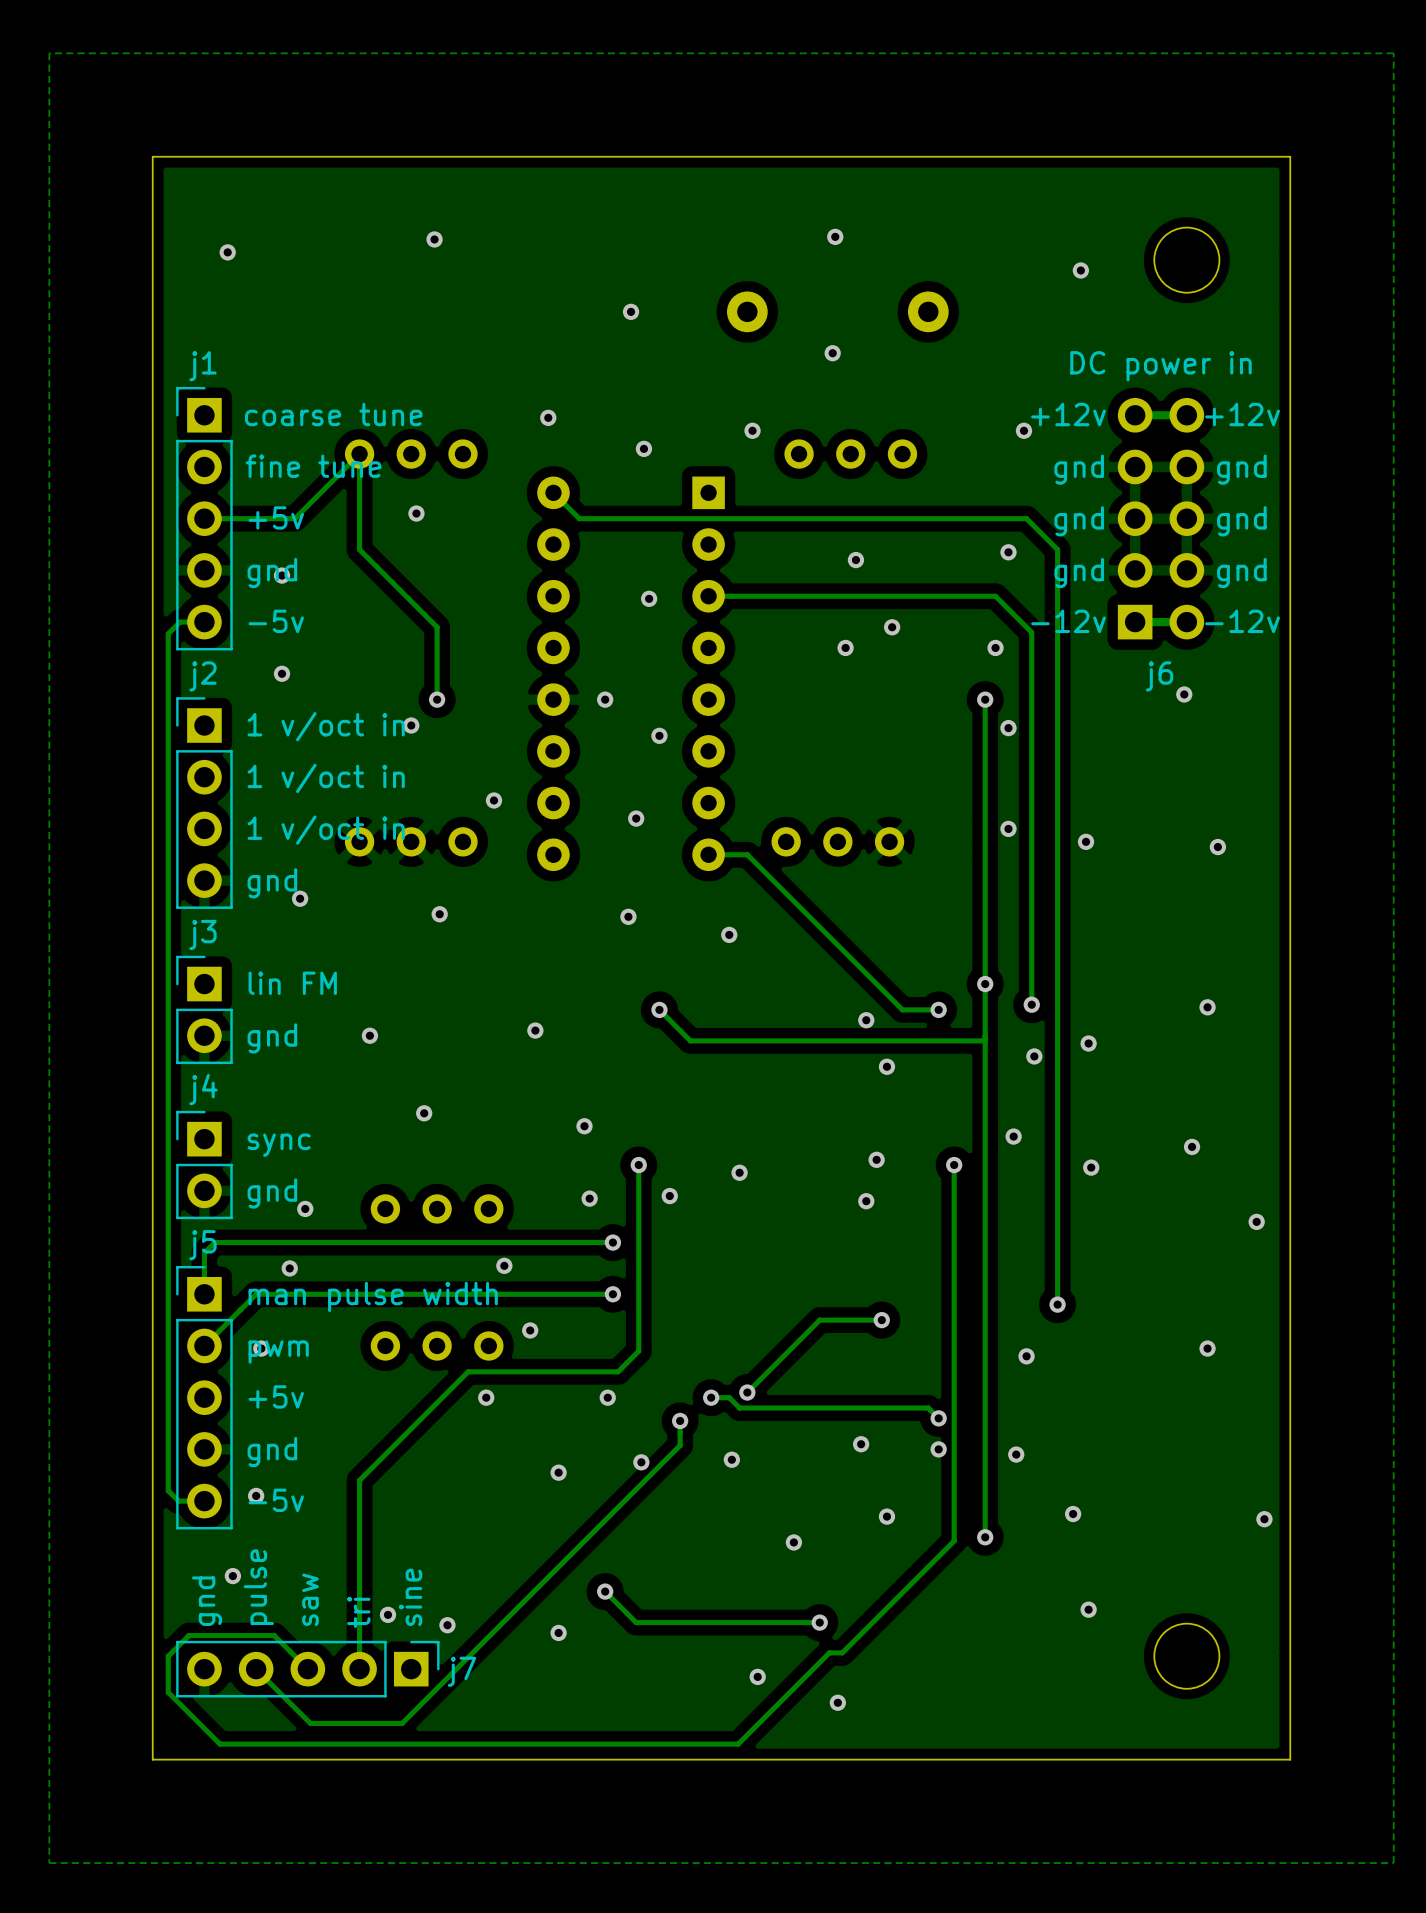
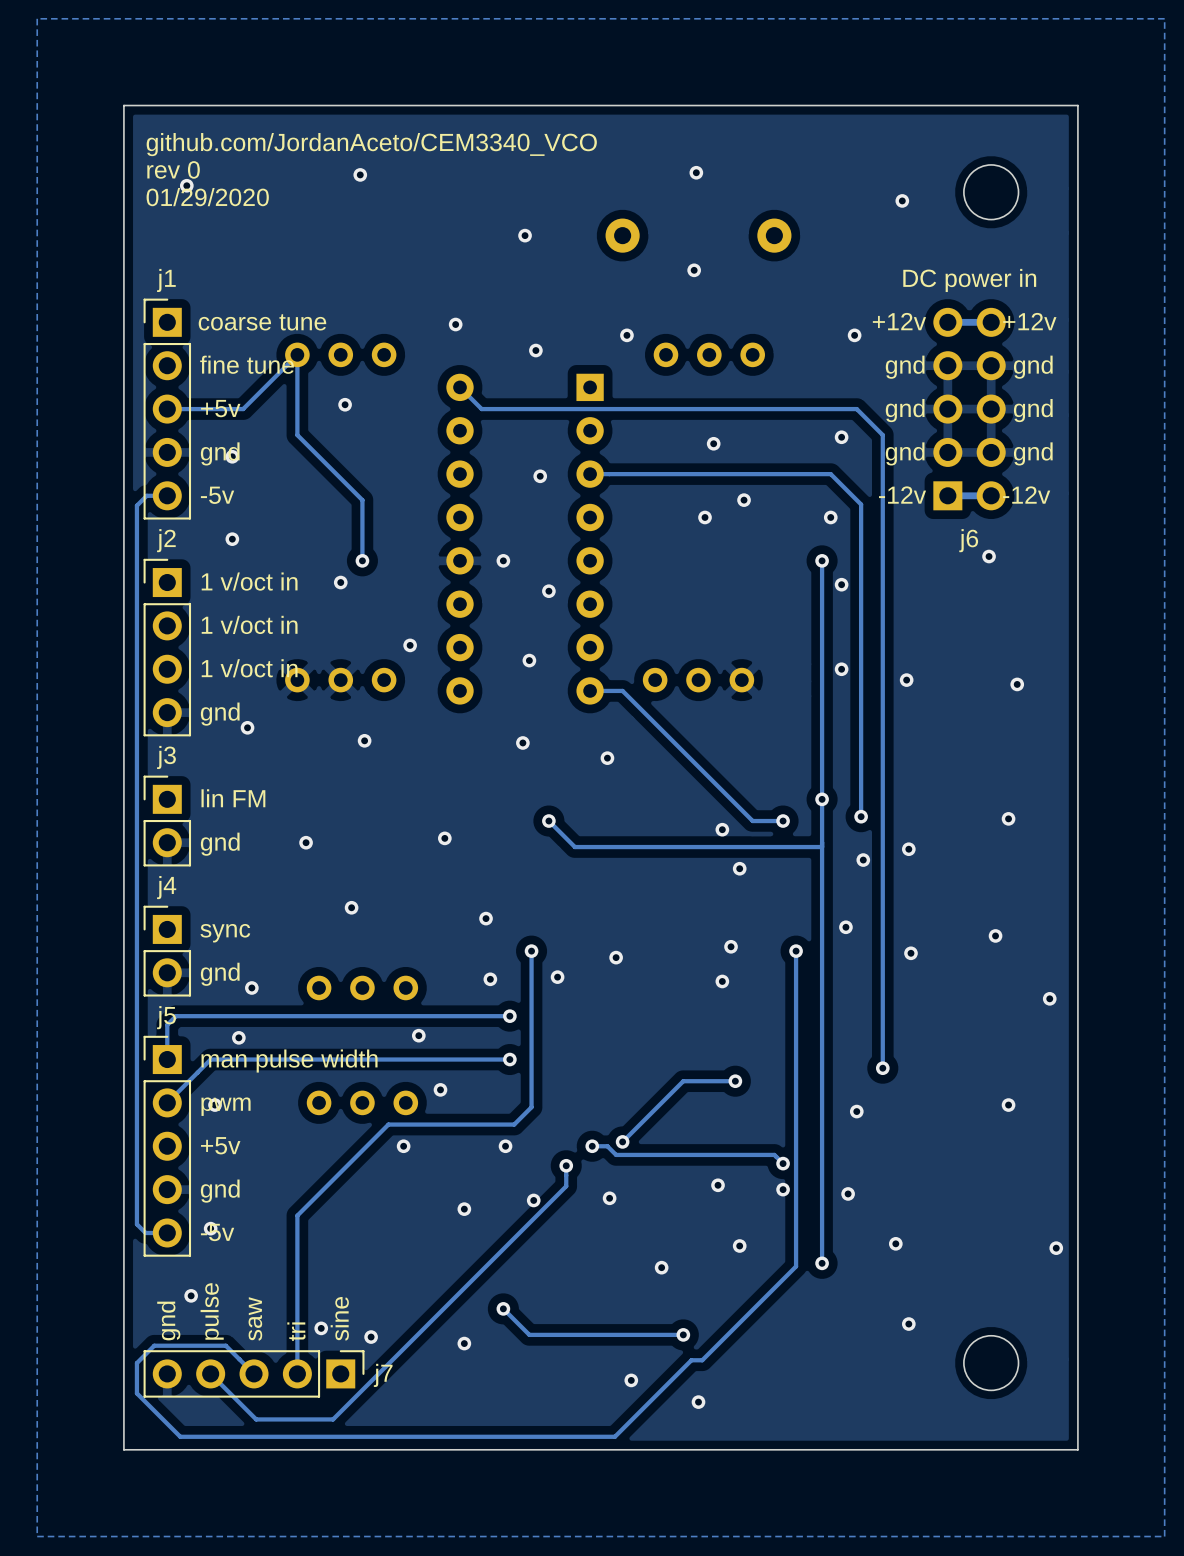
text: none -> github.com/JordanAceto/CEM3340_VCO (371, 144)
text: none -> rev 0 (173, 169)
text: none -> 01/29/2020 (207, 197)

